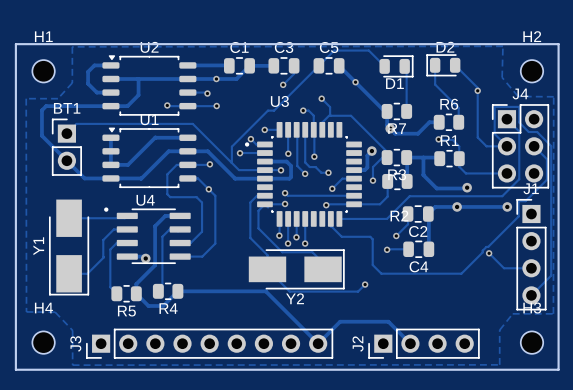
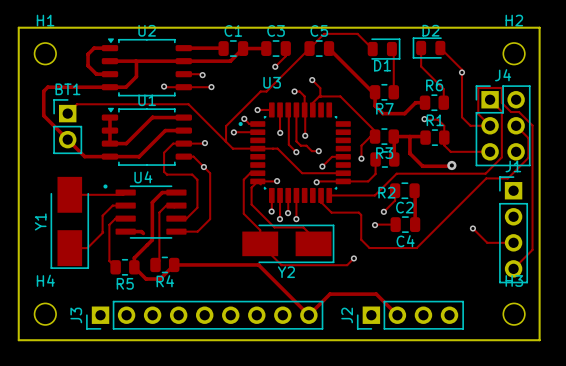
zone outline: (502, 46) (502, 77) (518, 96) (553, 96) (553, 313) (512, 313) (499, 330) (499, 364) (72, 365) (72, 330) (55, 312) (26, 311) (26, 98) (57, 98) (72, 82) (72, 46) (502, 46) -> none
via: (216, 79) -> none
via: (355, 82) -> none
via: (390, 128) -> none
track: (187, 151) (207, 151) (235, 178) (289, 178) (291, 177) (291, 165) (286, 161) (264, 161) -> none
track: (371, 151) (367, 155) (367, 167) (364, 170) (354, 170) -> none
via: (371, 151) -> none
via: (281, 170) -> none
track: (285, 193) (287, 195) (311, 195) -> (273, 148) (277, 148) (302, 173)
via: (285, 193) -> none
track: (518, 201) (518, 216) (461, 273) (430, 273) -> (501, 178) (486, 178) (416, 248)
via: (457, 206) -> none
track: (507, 206) (435, 206) (428, 214) -> none
via: (507, 206) -> none
via: (145, 258) -> none

